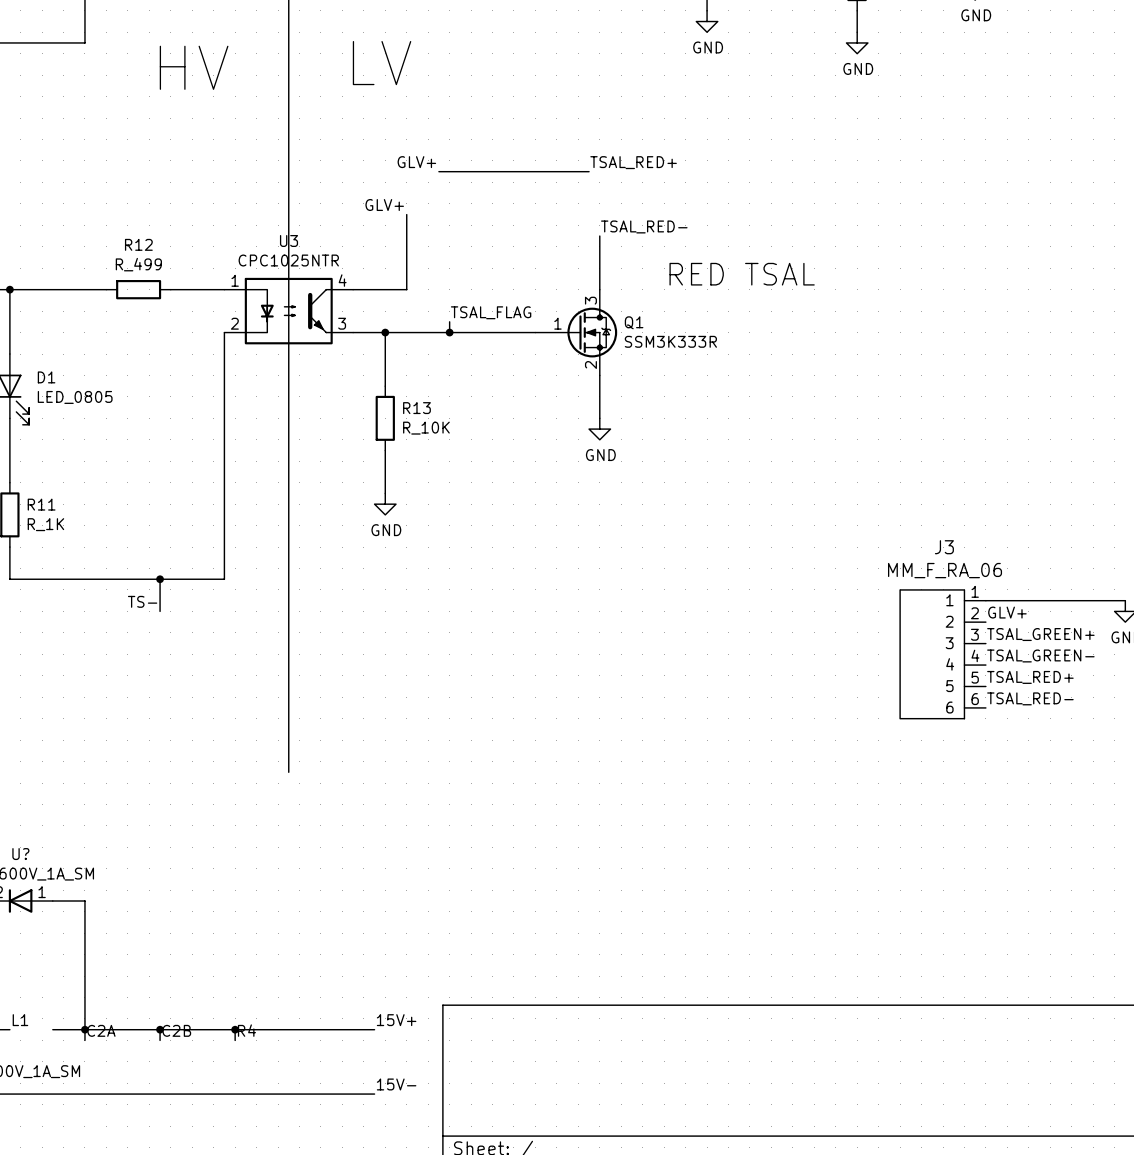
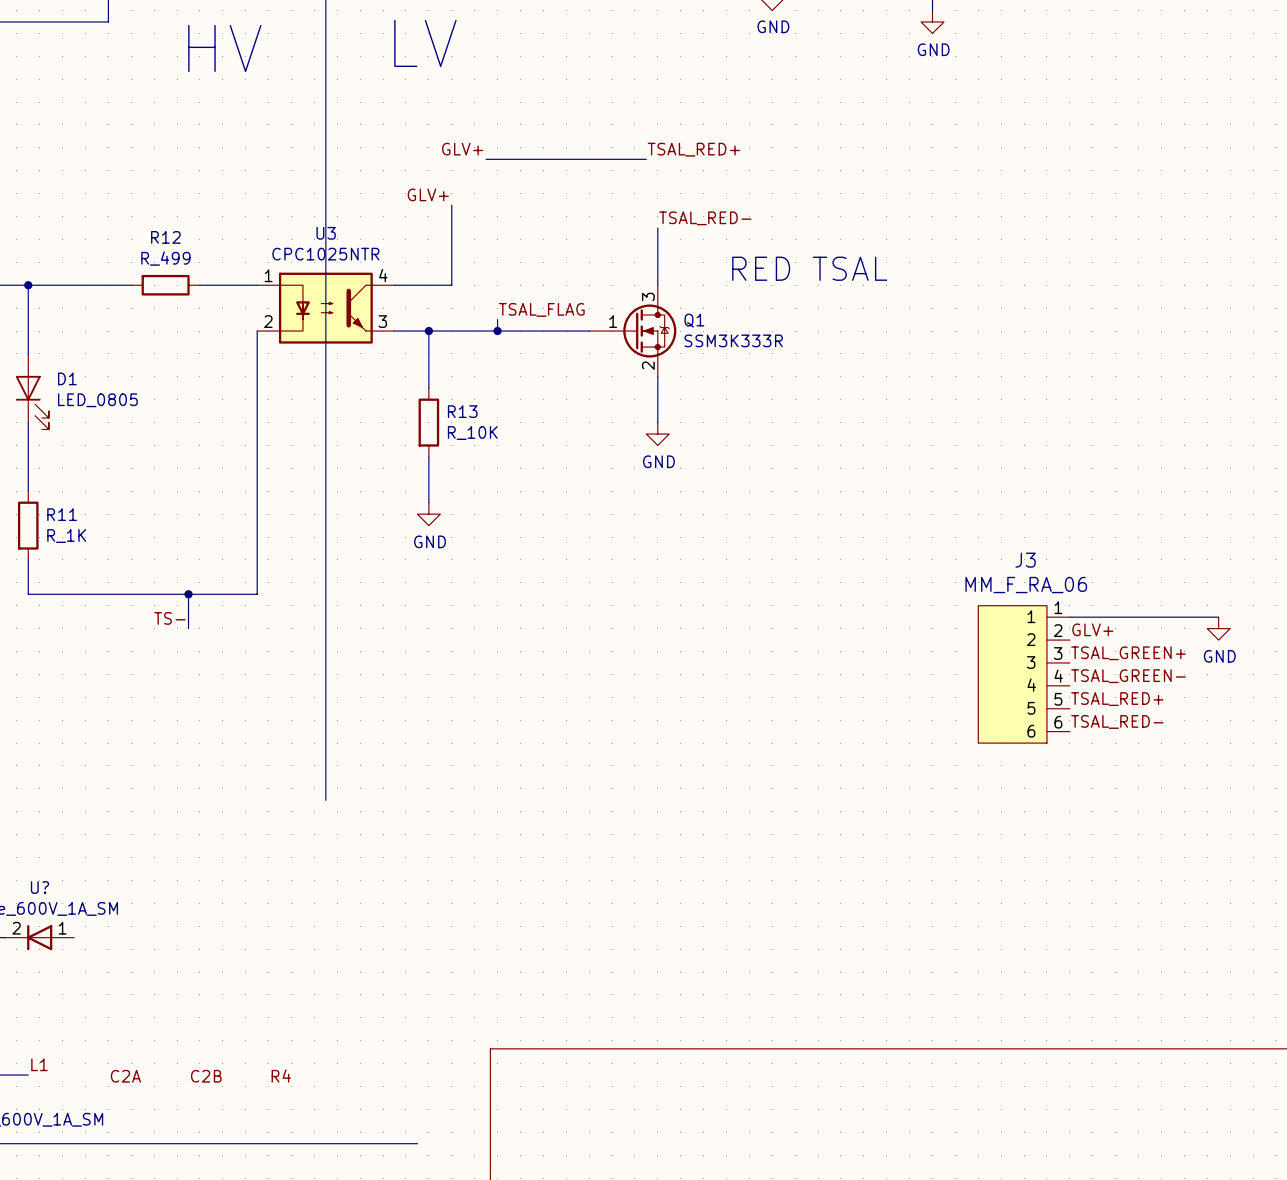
wire: (52, 901) (84, 901) (84, 1040) -> none
label: 15V+ (396, 1020) -> none
wire: (52, 1029) (374, 1029) -> none
junction: (84, 1029) -> none
wire: (160, 1029) (160, 1040) -> none
junction: (160, 1029) -> none
wire: (235, 1029) (235, 1040) -> none
junction: (235, 1029) -> none
label: 15V- (396, 1084) -> none

